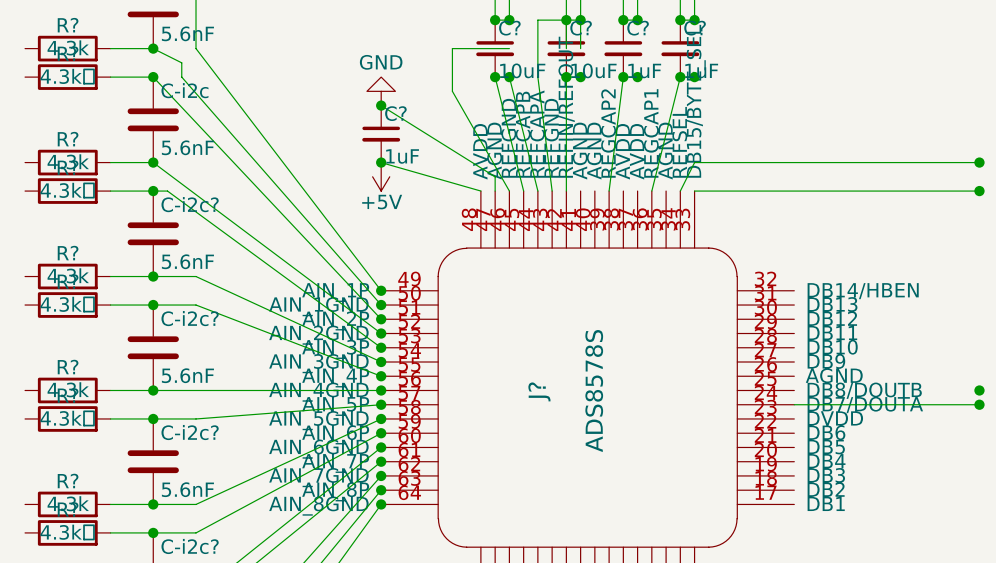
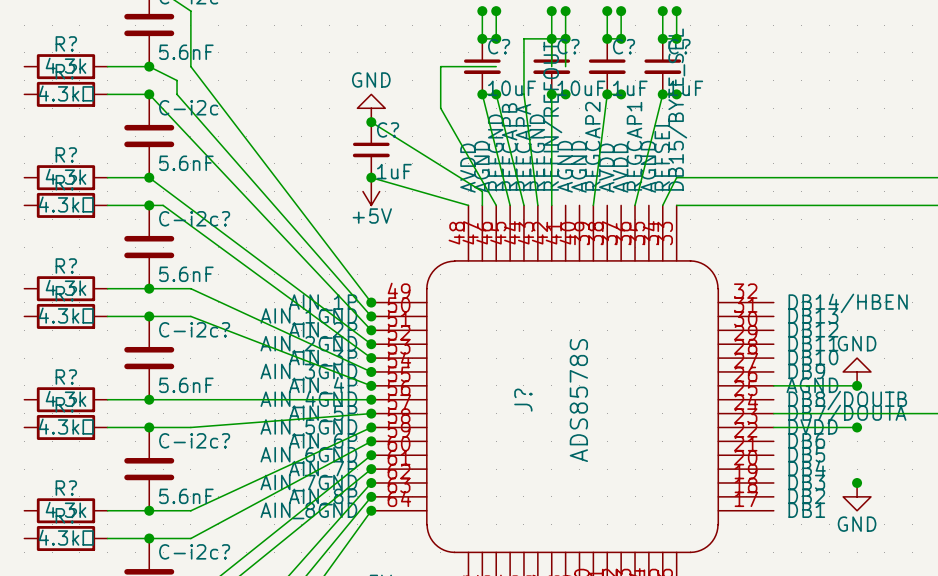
power symbol: none -> GND (857, 371)
wire: none -> (773, 385) (857, 385)
junction: none -> (857, 385)
wire: none -> (773, 427) (857, 427)
junction: none -> (857, 427)
junction: none -> (857, 482)
power symbol: none -> GND (857, 496)

